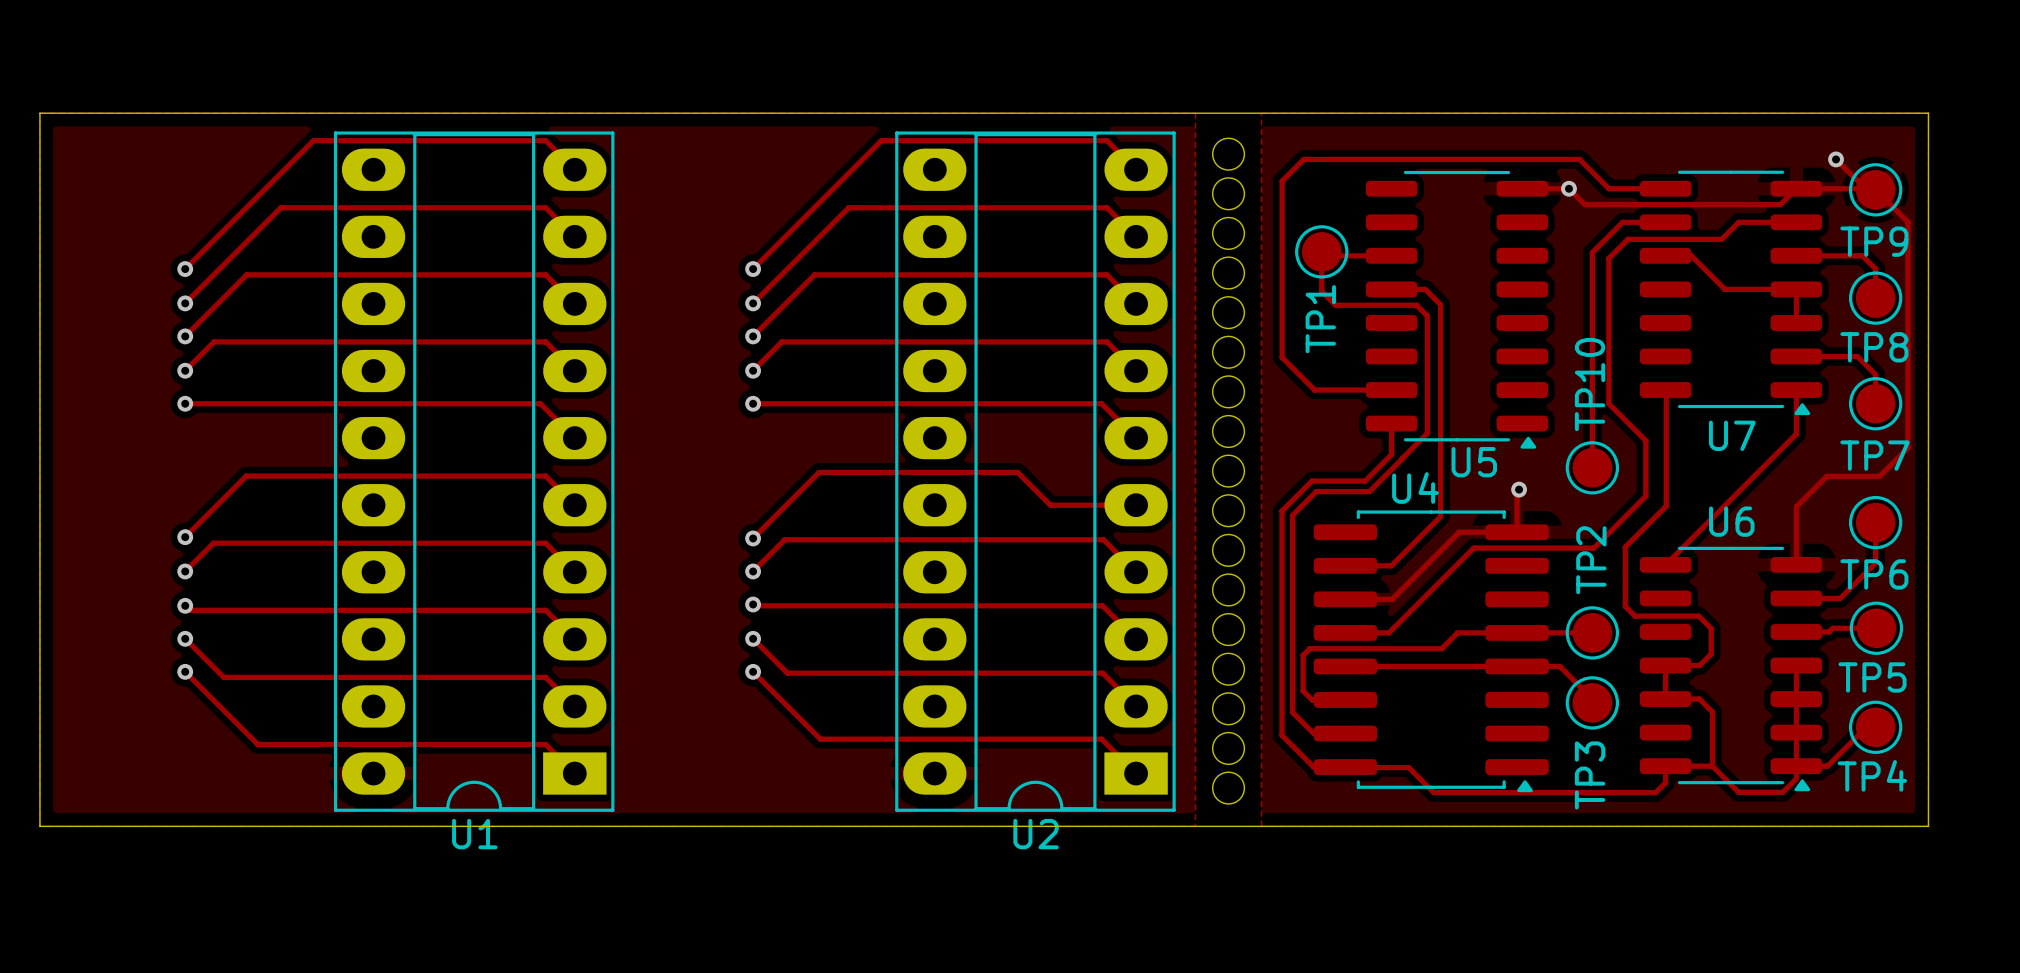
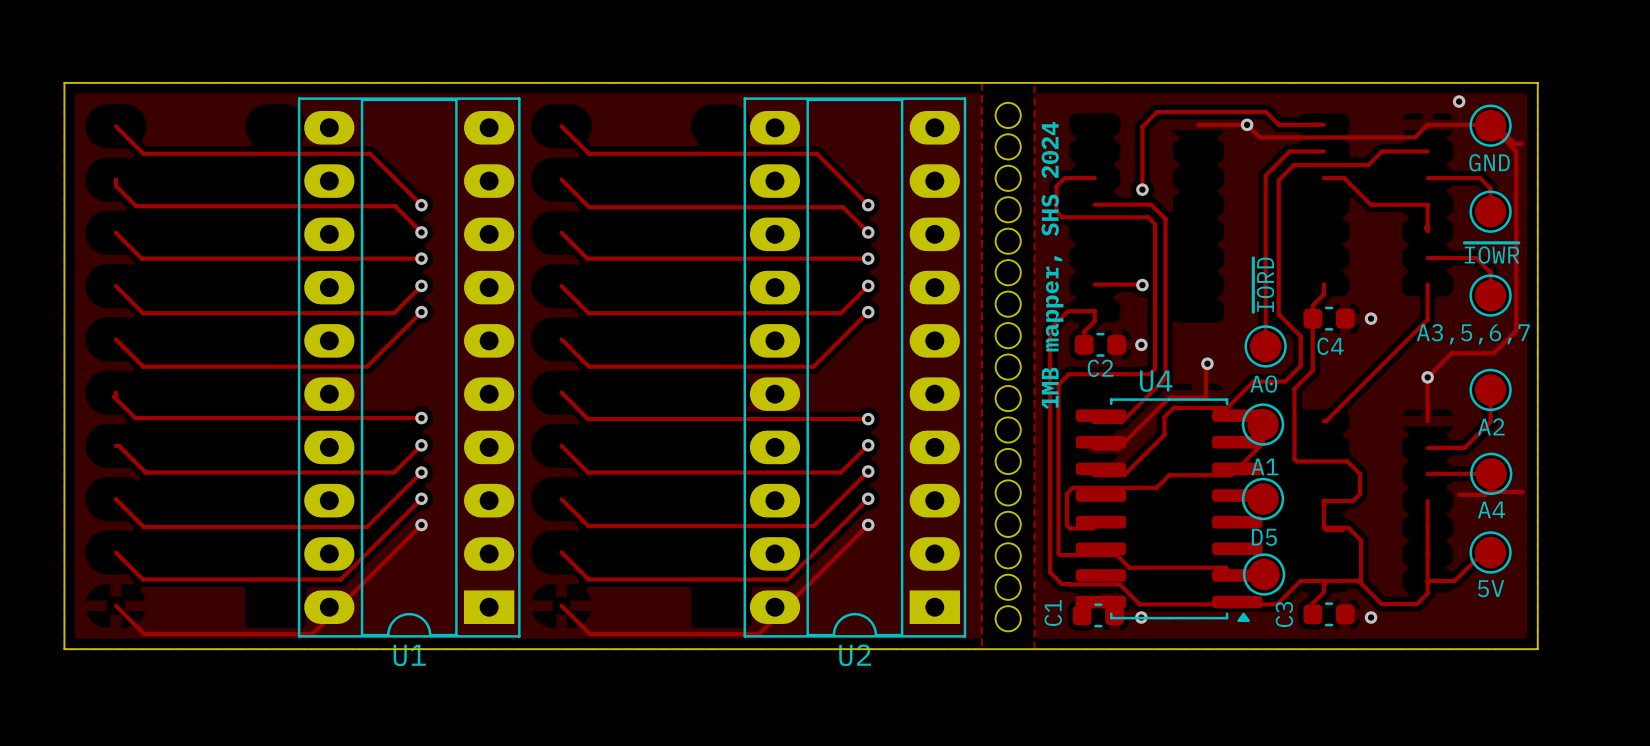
board edge: (1895, 113) (1928, 113) (1928, 826) (1895, 826) -> (1537, 82) (1537, 649)
via position: (1836, 159) -> (1459, 101)
track: none -> (1198, 124) (1247, 124) (1259, 137) (1415, 137) (1427, 124) (1489, 124) (1516, 151) (1516, 330) (1493, 353) (1451, 353) (1427, 377) (1427, 421)
track: none -> (1323, 124) (1278, 124) (1266, 112) (1157, 112) (1142, 126) (1142, 189)
track: none -> (115, 126) (143, 153) (370, 153) (421, 205)
track: none -> (561, 126) (589, 153) (816, 153) (868, 205)
part: none -> GND (1490, 125)
track: (574, 169) (545, 140) (313, 140) (185, 269) -> none
track: (1136, 169) (1107, 140) (881, 140) (753, 269) -> none
track: (1522, 188) (1568, 188) (1584, 204) (1780, 204) (1796, 188) (1874, 188) (1908, 222) (1908, 448) (1879, 476) (1826, 476) (1796, 506) (1796, 564) -> none
via position: (1568, 188) -> (1247, 124)
track: (1665, 188) (1609, 188) (1579, 159) (1303, 159) (1282, 181) (1282, 357) (1314, 390) (1391, 390) -> none
TP9: (1875, 189) -> none
track: none -> (1427, 151) (1381, 151) (1368, 165) (1293, 165) (1278, 180) (1278, 314) (1300, 336) (1300, 365) (1285, 381) (1253, 381) (1227, 407) (1176, 407)
track: (1665, 222) (1622, 222) (1592, 252) (1592, 467) -> (1323, 151) (1289, 151) (1265, 175) (1265, 346)
track: (1796, 222) (1738, 222) (1721, 239) (1628, 239) (1608, 258) (1608, 403) (1645, 440) (1645, 496) (1593, 548) (1473, 548) (1388, 632) (1345, 632) -> none
track: none -> (1094, 178) (1064, 178) (1056, 186) (1056, 211) (1062, 217) (1148, 217) (1155, 224) (1155, 368) (1149, 374) (1069, 374) (1058, 384) (1058, 553) (1060, 555) (1116, 555) (1129, 567) (1225, 567) (1232, 574) (1264, 574)
track: none -> (115, 179) (115, 185) (136, 206) (395, 206) (421, 232)
track: none -> (561, 179) (589, 207) (843, 207) (868, 232)
track: (574, 236) (545, 207) (280, 207) (185, 303) -> none
track: (1136, 236) (1107, 207) (848, 207) (753, 303) -> none
via: none -> (1142, 189)
TP1: (1321, 251) -> none
track: (1391, 255) (1325, 255) (1321, 251) (1321, 291) (1335, 305) (1416, 305) (1427, 316) (1427, 433) (1402, 458) -> none
track: (1665, 255) (1691, 255) (1724, 289) (1796, 289) (1796, 316) (1794, 318) (1796, 322) -> (1323, 178) (1344, 178) (1370, 204) (1427, 204) (1426, 227) (1427, 231)
track: (1796, 255) (1862, 255) (1875, 269) (1875, 298) -> (1427, 178) (1480, 178) (1490, 188) (1490, 211)
track: none -> (1094, 204) (1151, 204) (1165, 219) (1165, 378) (1121, 421) (1093, 421)
via: none -> (421, 205)
via: none -> (868, 205)
via: (185, 269) -> none
via: (753, 269) -> none
part: none -> ~{IOWR} (1490, 211)
track: (1391, 289) (1425, 289) (1440, 304) (1440, 516) (1391, 565) (1345, 565) -> none
U7: (1731, 292) -> none
TP8: (1875, 298) -> none
via: none -> (421, 232)
via: none -> (868, 232)
track: none -> (115, 232) (141, 258) (421, 258)
track: none -> (561, 232) (587, 258) (868, 258)
via: (185, 303) -> none
track: (574, 303) (545, 274) (246, 274) (185, 336) -> none
via: (753, 303) -> none
track: (1136, 303) (1107, 274) (814, 274) (753, 336) -> none
U5: (1457, 309) -> none
text: none -> 1MB mapper, SHS 2024 (1052, 265)
via: none -> (421, 258)
via: none -> (868, 258)
via: (185, 336) -> none
via: (753, 336) -> none
track: (1796, 356) (1857, 356) (1875, 374) (1875, 403) -> (1427, 258) (1476, 258) (1490, 272) (1490, 295)
track: none -> (1094, 284) (1142, 285)
via: none -> (1142, 285)
track: none -> (1324, 285) (1323, 294) (1312, 305) (1312, 370) (1294, 388) (1294, 459) (1296, 461) (1347, 461) (1360, 474) (1360, 494) (1353, 501) (1323, 501) (1323, 527)
track: none -> (1427, 284) (1427, 319) (1326, 421) (1323, 421)
track: none -> (421, 285) (394, 313) (142, 313) (115, 286)
via: none -> (421, 285)
track: none -> (868, 285) (840, 313) (588, 313) (561, 286)
via: none -> (868, 285)
track: (185, 370) (214, 341) (545, 341) (574, 371) -> none
via: (185, 370) -> none
track: (753, 370) (781, 341) (1107, 341) (1136, 371) -> none
via: (753, 370) -> none
part: none -> A3,5,6,7 (1490, 295)
track: (1665, 390) (1666, 506) (1625, 547) (1625, 606) (1635, 616) (1698, 616) (1711, 628) (1711, 654) (1699, 665) (1665, 665) (1665, 699) (1699, 699) (1712, 712) (1712, 766) -> none
track: (1796, 390) (1796, 434) (1665, 564) -> none
track: none -> (421, 312) (366, 366) (143, 366) (115, 339)
via: none -> (421, 312)
track: none -> (868, 312) (813, 366) (588, 366) (561, 339)
via: none -> (868, 312)
track: (185, 403) (540, 403) (574, 438) -> none
via: (185, 403) -> none
track: (753, 403) (1101, 403) (1136, 438) -> none
via: (753, 403) -> none
TP7: (1875, 403) -> none
C4: none -> (1329, 318)
via: none -> (1371, 318)
track: (1391, 423) (1391, 454) (1365, 481) (1311, 481) (1282, 510) (1282, 735) (1313, 767) (1408, 767) (1433, 792) (1655, 792) (1665, 782) (1665, 766) (1712, 766) -> none
track: none -> (1084, 344) (1084, 331) (1094, 321) (1094, 311) (1068, 311) (1050, 329) (1050, 572) (1061, 584) (1119, 584) (1139, 604) (1277, 604) (1300, 581) (1358, 581) (1381, 604) (1416, 604) (1427, 593) (1427, 501)
C2: none -> (1100, 344)
via: none -> (1141, 344)
part: none -> ~{IORD} (1265, 346)
track: (1402, 458) (1369, 491) (1316, 491) (1292, 515) (1292, 712) (1313, 733) (1345, 733) -> none
track: none -> (1207, 363) (1205, 397) (1169, 397) (1118, 448) (1093, 448)
TP10: (1592, 467) -> none
via: none -> (1427, 377)
track: (1519, 489) (1517, 491) (1517, 532) (1459, 532) (1392, 599) (1345, 599) -> none
via position: (1519, 489) -> (1207, 363)
track: none -> (1490, 389) (1490, 422) (1464, 447) (1427, 447)
part: none -> A2 (1490, 389)
track: none -> (115, 392) (114, 397) (135, 418) (421, 418)
track: none -> (561, 392) (588, 419) (868, 419)
track: (574, 505) (545, 476) (246, 476) (185, 537) -> none
track: (1136, 505) (1050, 505) (1017, 472) (819, 472) (753, 538) -> none
track: none -> (1176, 407) (1164, 417) (1164, 435) (1124, 475) (1093, 475)
track: (1875, 522) (1875, 563) (1840, 598) (1796, 598) -> none
TP6: (1875, 522) -> none
via: none -> (421, 418)
via: none -> (868, 419)
via: (185, 537) -> none
via: (753, 538) -> none
track: none -> (1263, 424) (1263, 443) (1231, 475) (1169, 475) (1156, 487) (1072, 487) (1066, 493) (1066, 525) (1070, 528) (1093, 528)
part: none -> A0 (1263, 424)
track: none -> (421, 445) (394, 472) (145, 472) (119, 445) (115, 445)
via: none -> (421, 445)
track: none -> (868, 445) (840, 472) (588, 472) (561, 445)
via: none -> (868, 445)
track: (185, 571) (213, 543) (545, 543) (574, 572) -> none
via: (185, 571) -> none
track: (753, 571) (784, 539) (1103, 539) (1136, 572) -> none
via: (753, 571) -> none
via: none -> (868, 471)
via: none -> (421, 472)
track: none -> (869, 472) (813, 526) (588, 526) (561, 499)
track: (753, 604) (1102, 605) (1136, 639) -> none
via: (753, 604) -> none
track: (185, 605) (189, 610) (545, 610) (574, 639) -> none
via: (185, 605) -> none
track: none -> (1491, 473) (1427, 474)
part: none -> A4 (1491, 473)
track: none -> (425, 476) (421, 472) (366, 527) (143, 527) (115, 499)
TP5: (1876, 628) -> none
track: (1592, 632) (1457, 632) (1441, 648) (1309, 648) (1303, 655) (1303, 691) (1312, 699) (1345, 699) -> none
TP2: (1592, 632) -> none
track: none -> (421, 498) (340, 579) (142, 579) (115, 552)
via: none -> (421, 498)
track: none -> (868, 498) (787, 579) (588, 579) (561, 552)
via: none -> (868, 498)
part: none -> A1 (1263, 499)
track: (185, 638) (223, 677) (545, 677) (574, 706) -> none
via: (185, 638) -> none
track: (753, 638) (787, 673) (1102, 673) (1137, 707) -> none
via: (753, 638) -> none
track: (1796, 665) (1796, 778) (1782, 792) (1738, 792) (1712, 766) -> none
track: (1345, 666) (1559, 666) (1592, 698) (1592, 702) -> none
U6: (1731, 669) -> none
track: none -> (421, 525) (312, 634) (144, 634) (115, 605)
via: none -> (421, 525)
track: none -> (868, 525) (759, 634) (589, 634) (561, 605)
via: none -> (868, 525)
track: (185, 671) (257, 744) (545, 744) (574, 773) -> none
via: (185, 671) -> none
track: (753, 671) (820, 739) (1101, 739) (1136, 773) -> none
via: (753, 671) -> none
track: none -> (1323, 527) (1326, 530) (1342, 530)
track: none -> (1323, 527) (1348, 527) (1361, 540) (1361, 583)
TP3: (1592, 702) -> none
track: none -> (1490, 552) (1483, 552) (1454, 581) (1427, 581)
part: none -> 5V (1490, 552)
track: (1875, 727) (1866, 727) (1827, 766) (1796, 766) -> none
TP4: (1875, 727) -> none
part: none -> D5 (1264, 574)
track: none -> (1326, 583) (1323, 581) (1323, 592) (1312, 603) (1312, 614)
C3: none -> (1329, 614)
C1: none -> (1098, 615)
via: none -> (1141, 617)
via: none -> (1371, 617)

